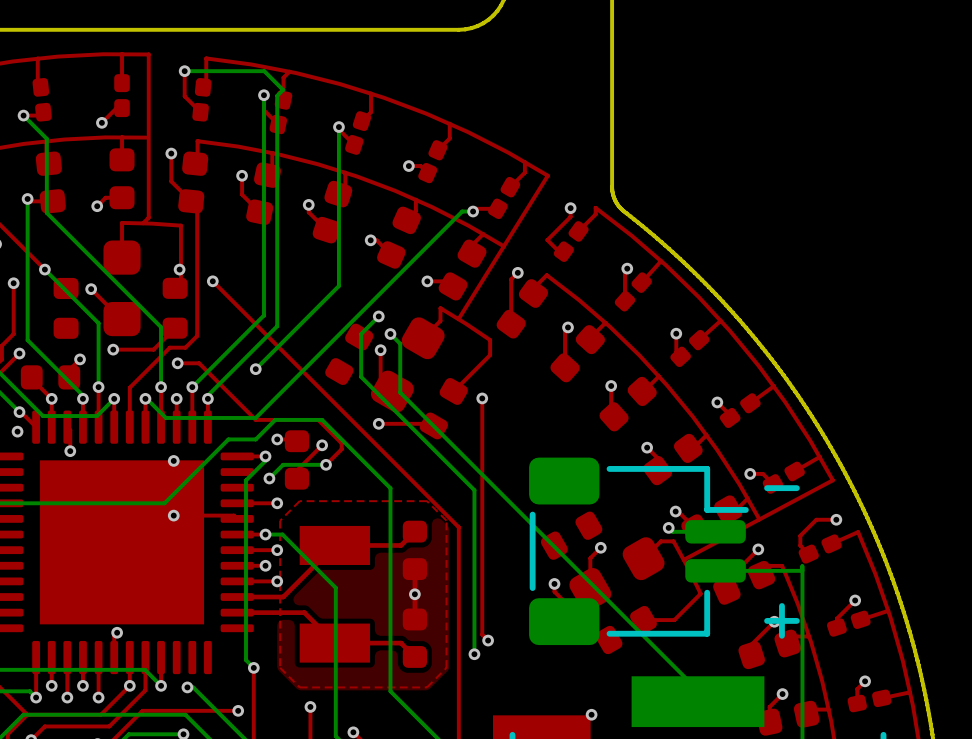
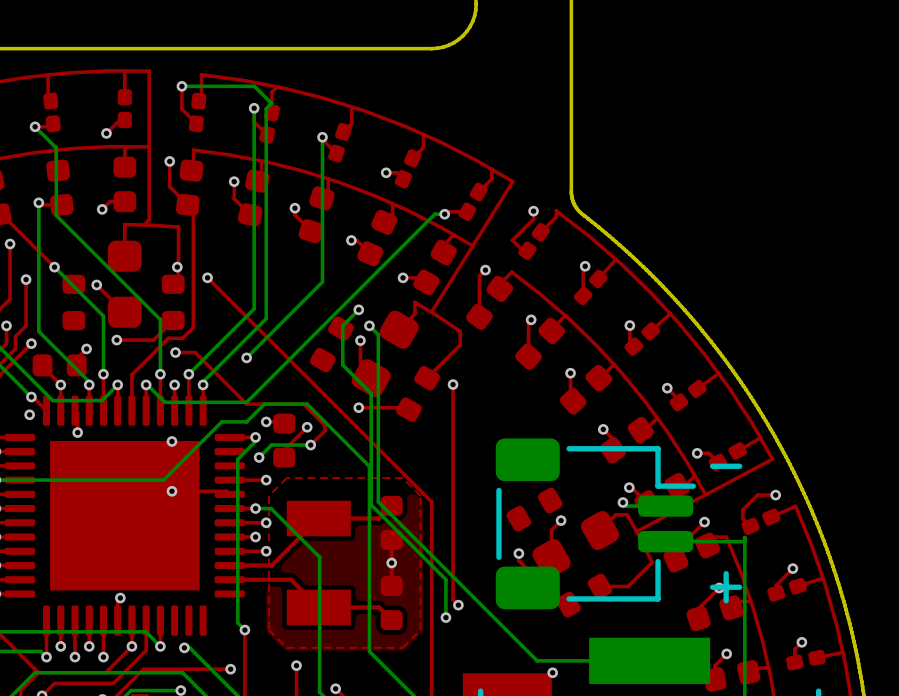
bottom track: (400, 392) (698, 690) (698, 701) -> (378, 379) (378, 501) (537, 660) (649, 660)
bottom track: (392, 408) (474, 490) (474, 612) -> (371, 393) (371, 504) (445, 579)

